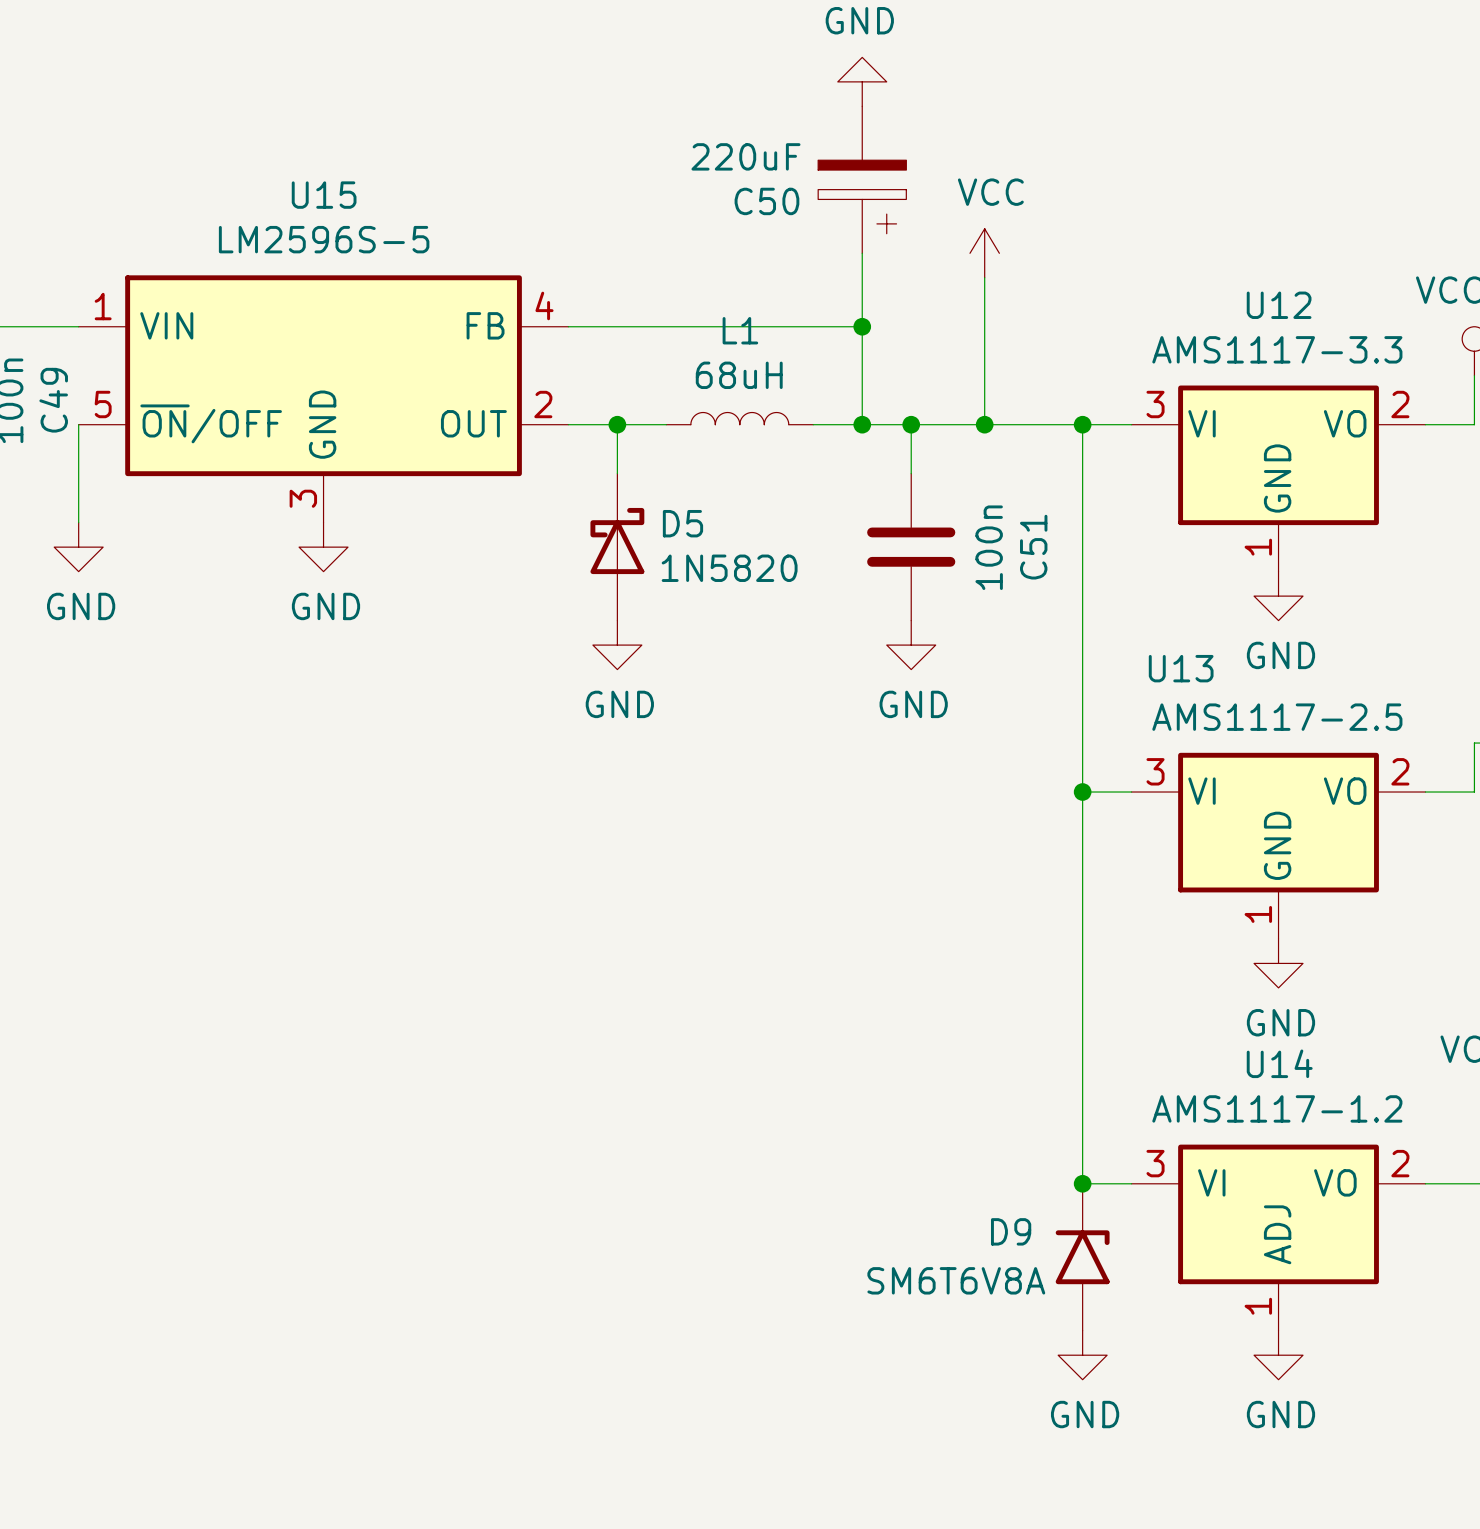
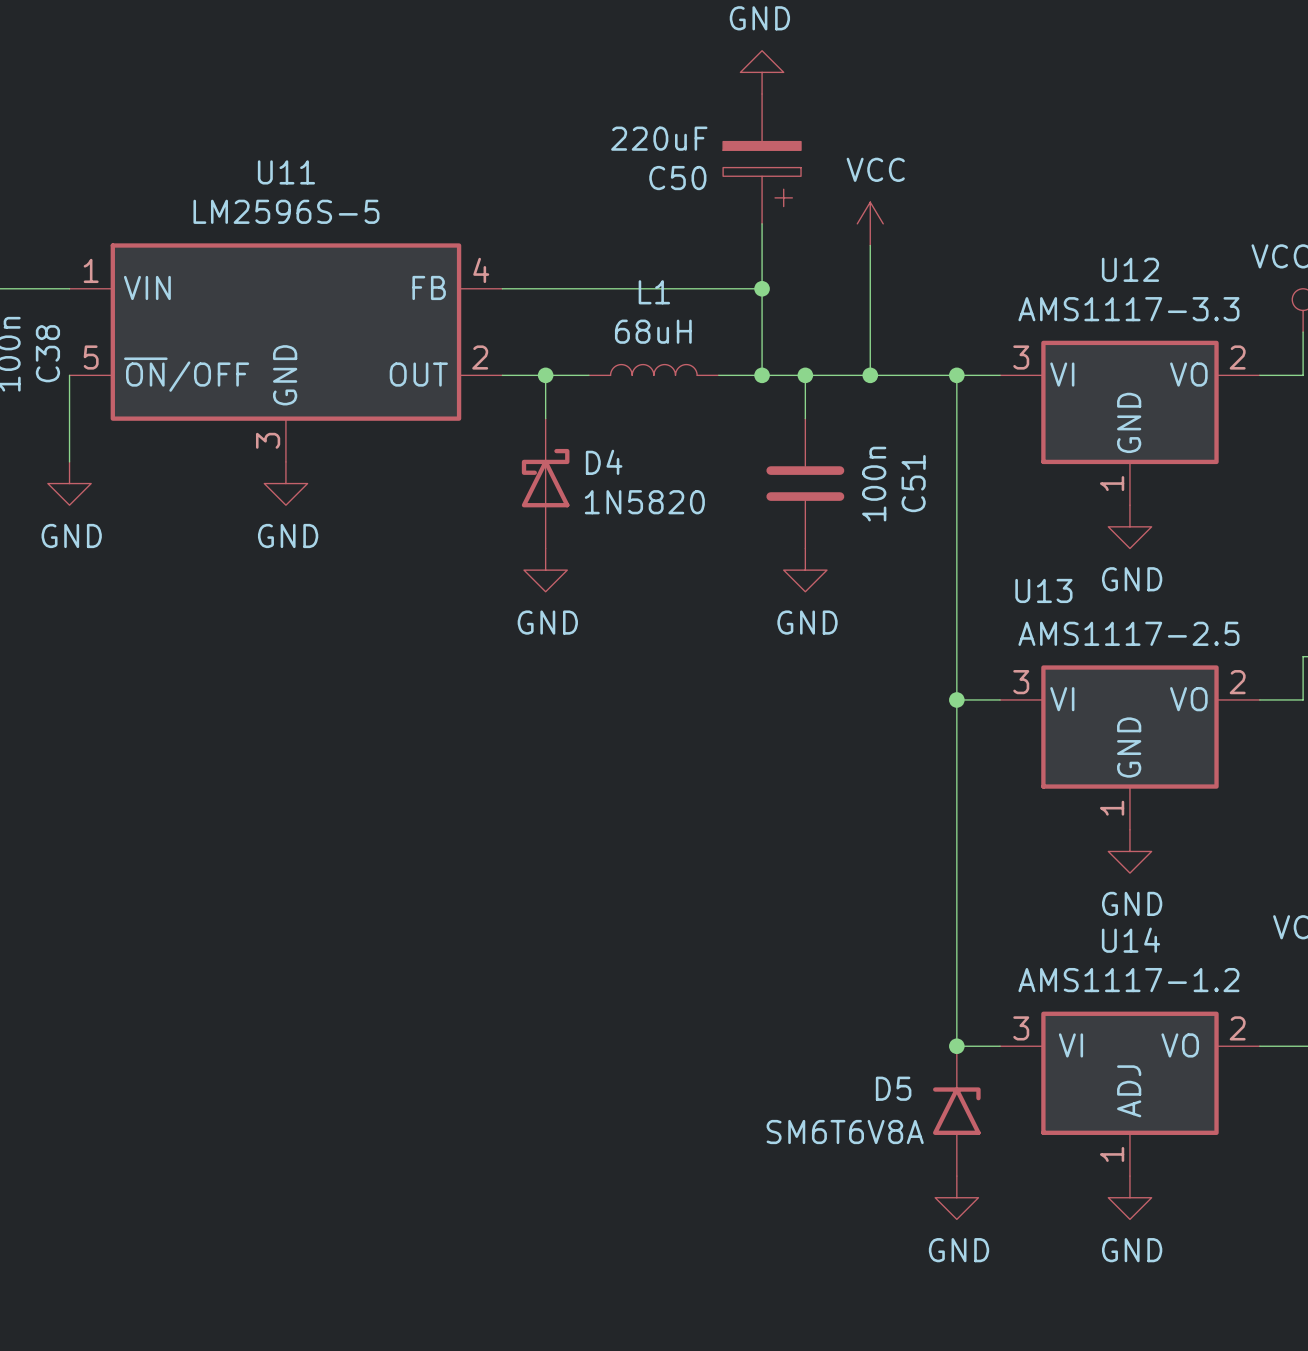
U15 name: U15 (324, 195) -> U11 (286, 172)
C49 name: C49 (53, 400) -> C38 (47, 353)
D5 name: D5 (682, 523) -> D4 (604, 462)
D9 name: D9 (1011, 1231) -> D5 (893, 1088)

